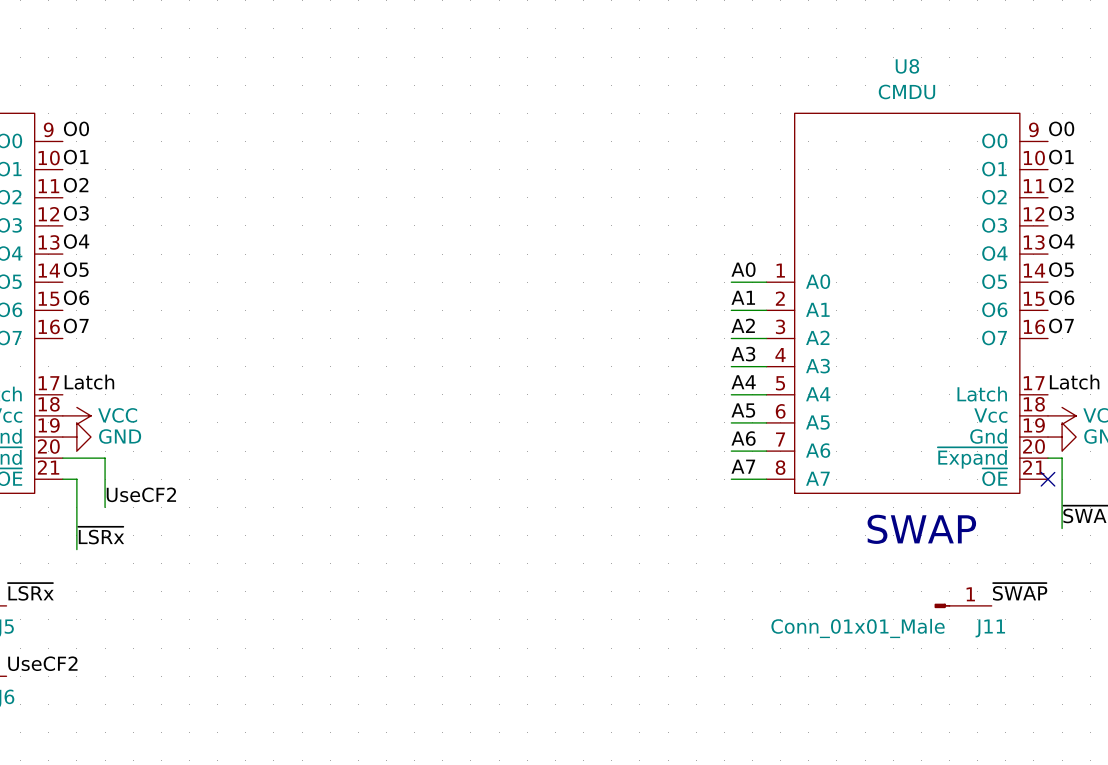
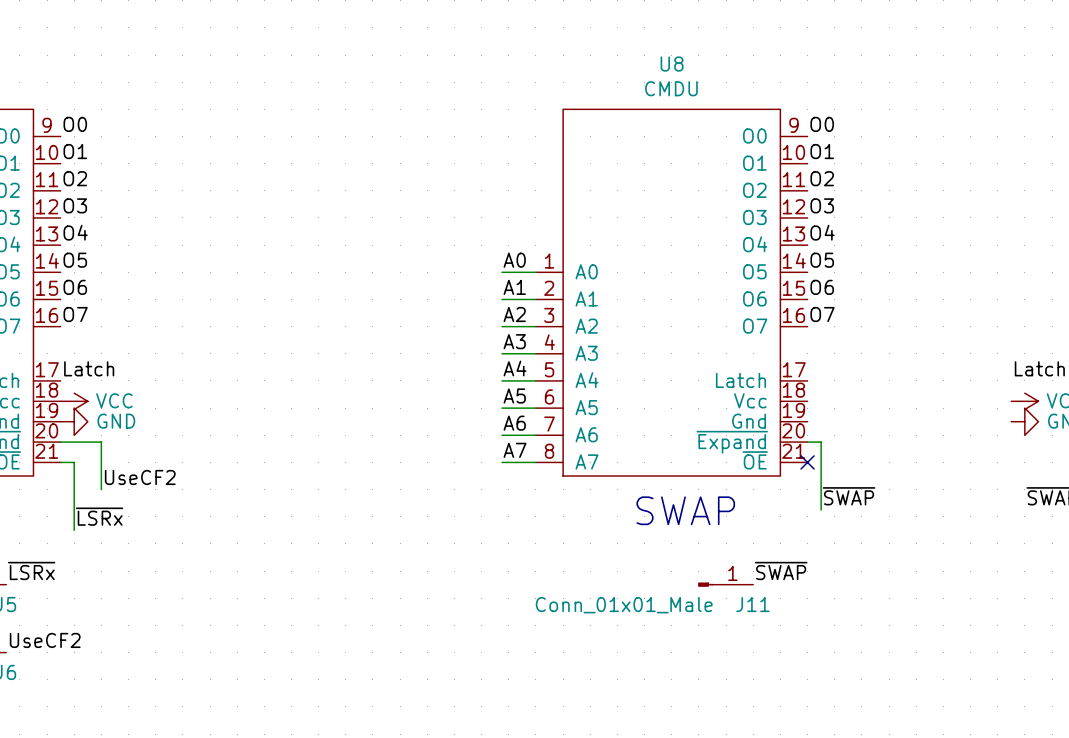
label position: O0 (1061, 128) -> O0 (822, 124)
label position: O1 (1061, 157) -> O1 (822, 151)
label position: O2 (1061, 185) -> O2 (822, 178)
label position: O3 (1061, 213) -> O3 (822, 205)
label position: O4 (1061, 241) -> O4 (822, 232)
label position: A0 (743, 269) -> A0 (514, 260)
label position: O5 (1061, 269) -> O5 (822, 260)
wire: (731, 282) (766, 282) -> (501, 272) (535, 272)
label position: A1 (743, 297) -> A1 (514, 287)
label position: O6 (1061, 297) -> O6 (822, 287)
U8 position: (907, 303) -> (671, 292)
wire: (731, 310) (766, 310) -> (501, 299) (535, 299)
label position: A2 (743, 325) -> A2 (514, 314)
label position: O7 (1061, 325) -> O7 (822, 314)
wire: (731, 338) (766, 338) -> (501, 326) (535, 326)
label position: A3 (743, 354) -> A3 (514, 341)
wire: (731, 366) (766, 366) -> (501, 353) (535, 353)
label position: A4 (743, 382) -> A4 (515, 368)
wire: (731, 394) (766, 394) -> (501, 380) (535, 380)
label position: A5 (743, 410) -> A5 (514, 395)
wire: (731, 422) (766, 422) -> (501, 408) (535, 408)
label position: A6 (743, 438) -> A6 (514, 423)
wire: (731, 451) (766, 451) -> (501, 435) (535, 435)
wire: (1048, 458) (1062, 458) (1062, 528) -> (807, 442) (821, 442) (821, 509)
label position: A7 (743, 466) -> A7 (515, 450)
wire: (731, 479) (766, 479) -> (501, 462) (535, 462)
no-connect mark: none -> (807, 462)
no-connect mark: (1048, 479) -> none
label: none -> ~{SWAP} (849, 496)
text position: SWAP (921, 529) -> SWAP (685, 510)
label: none -> ~{SWAP} (781, 570)
label: ~{SWAP} (1020, 591) -> none
J11 position: (963, 605) -> (725, 584)

